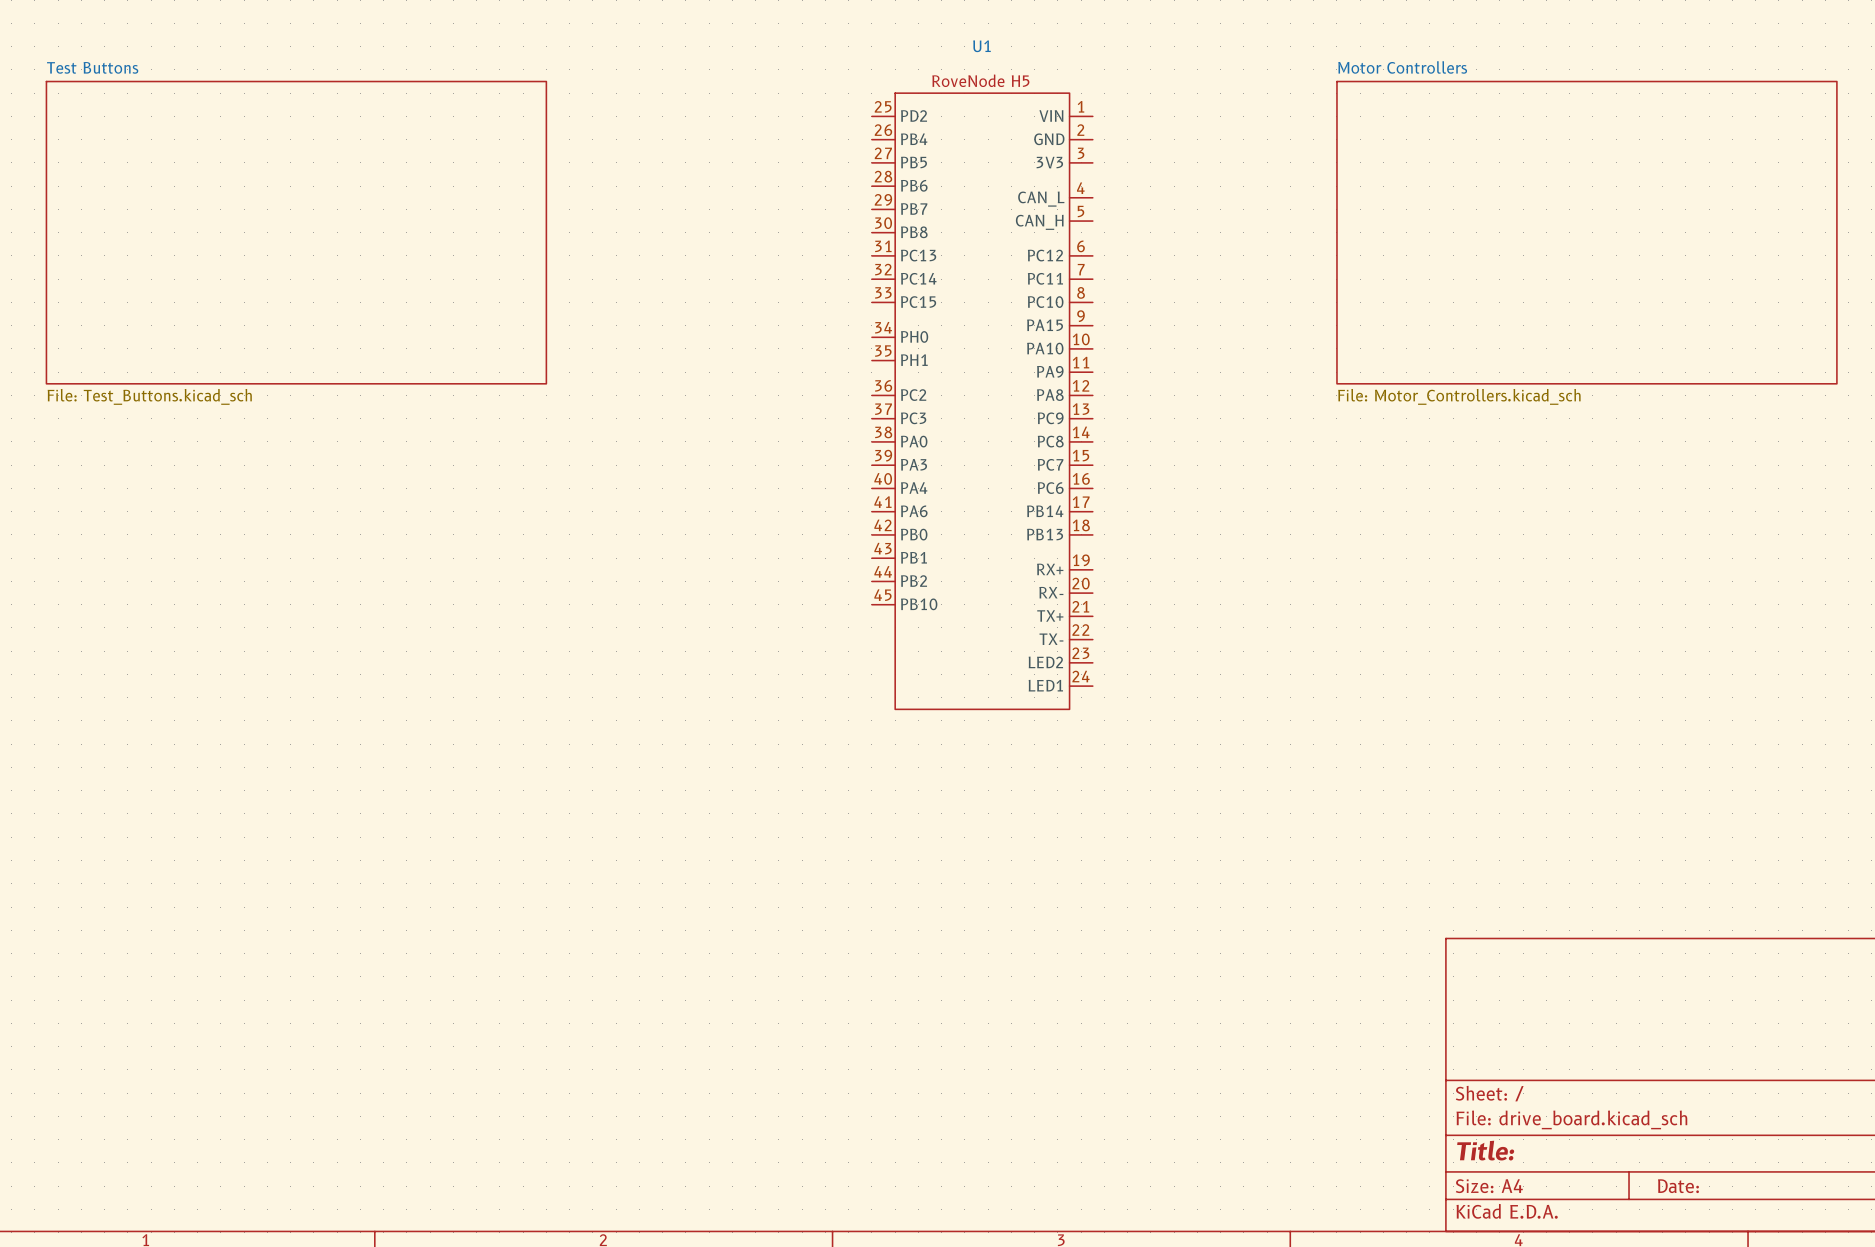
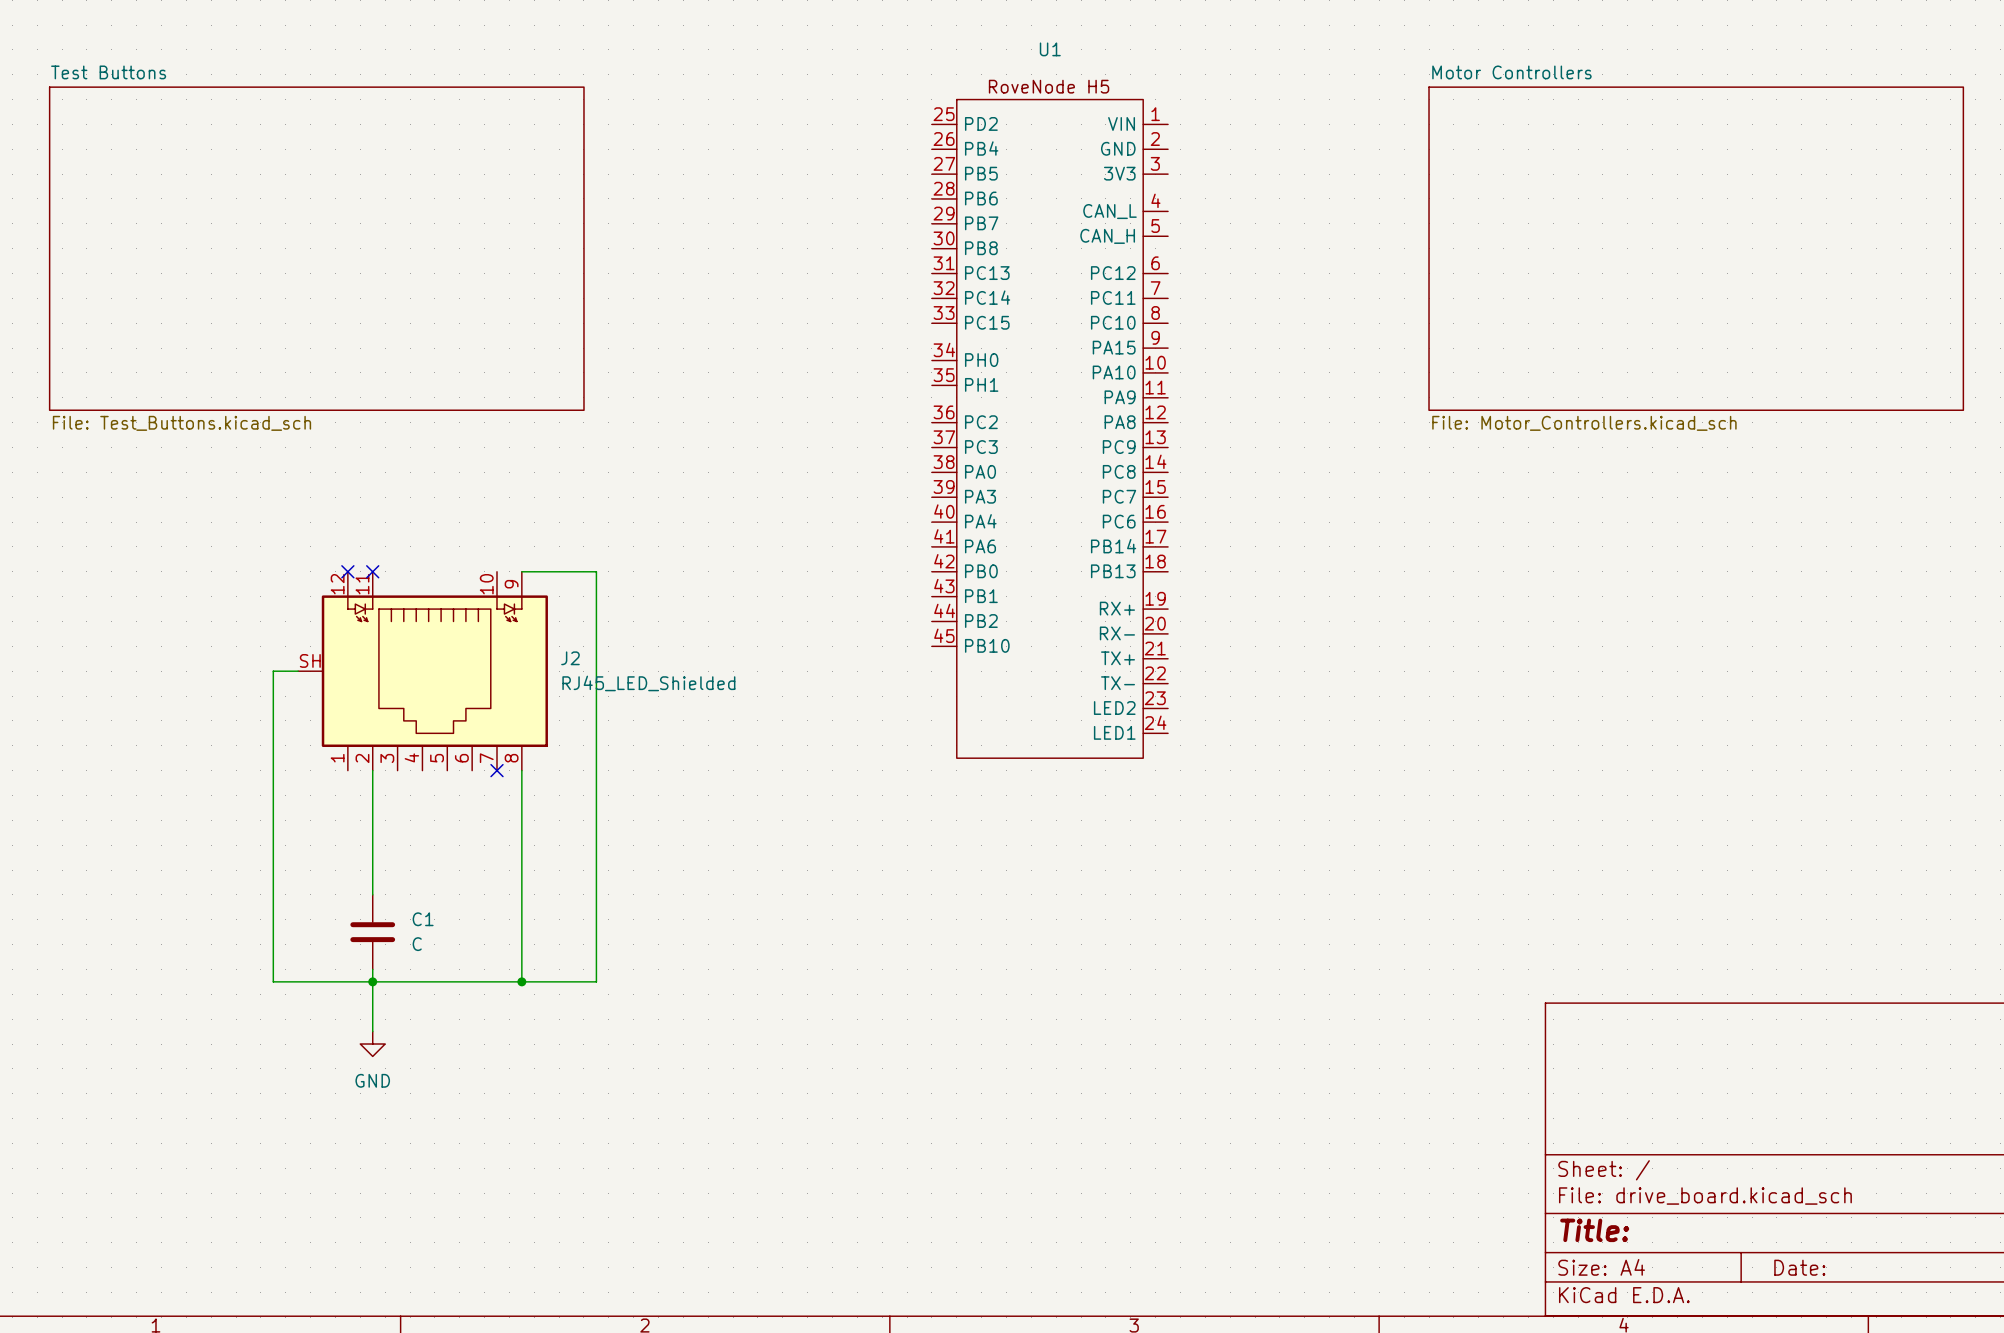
no-connect mark: none -> (347, 571)
no-connect mark: none -> (372, 571)
wire: none -> (521, 571) (596, 571) (596, 981) (273, 981) (273, 671) (298, 671)
J2: none -> RJ45_LED_Shielded (423, 671)
wire: none -> (372, 770) (372, 894)
no-connect mark: none -> (497, 770)
wire: none -> (521, 770) (521, 981)
C1: none -> C (372, 932)
wire: none -> (372, 969) (372, 1031)
junction: none -> (372, 981)
junction: none -> (521, 981)
power symbol: none -> GND (372, 1044)

